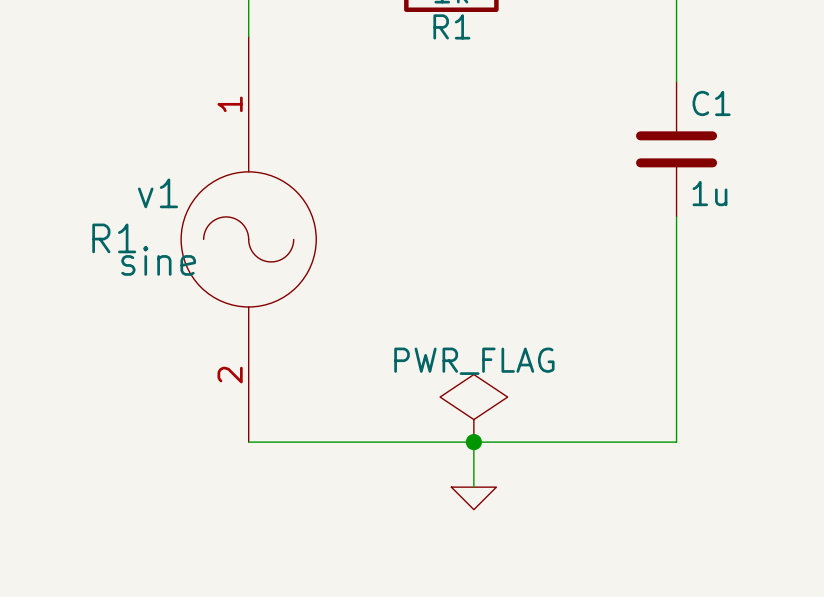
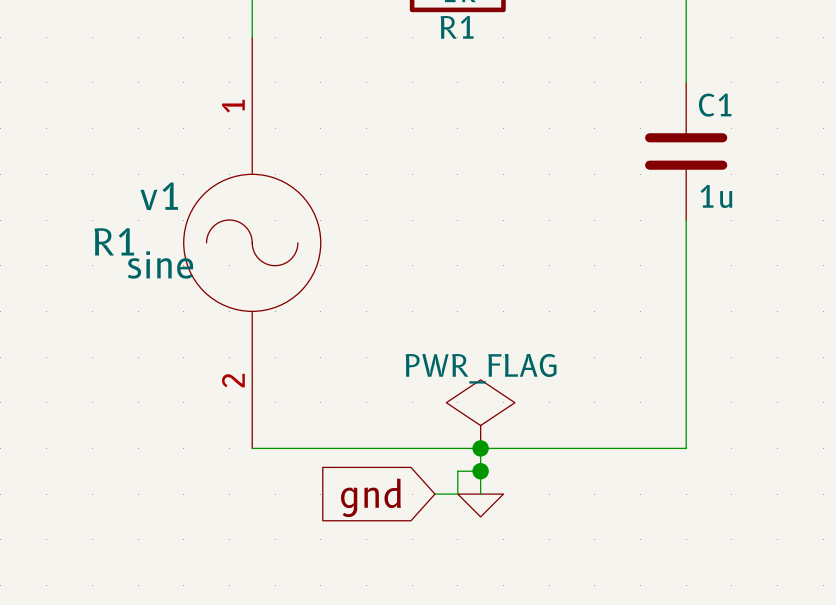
wire: none -> (480, 471) (457, 471) (457, 494) (434, 494)
junction: none -> (480, 471)
global label: none -> gnd (370, 497)

